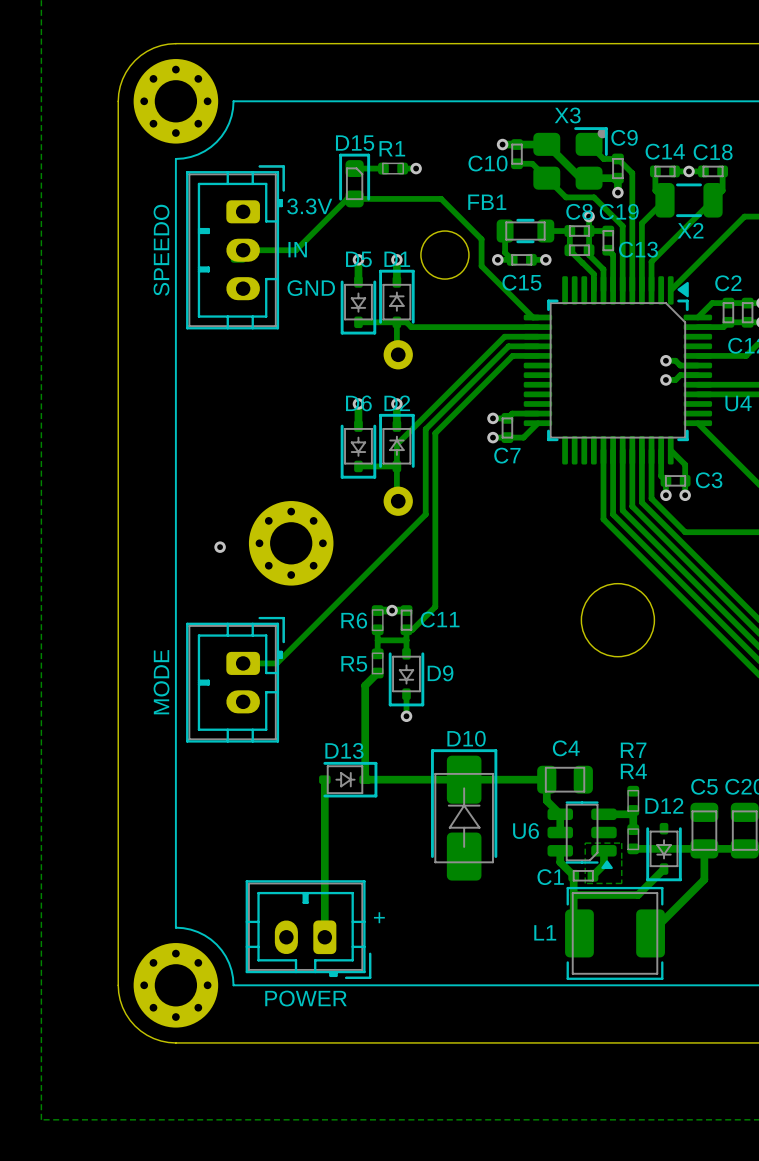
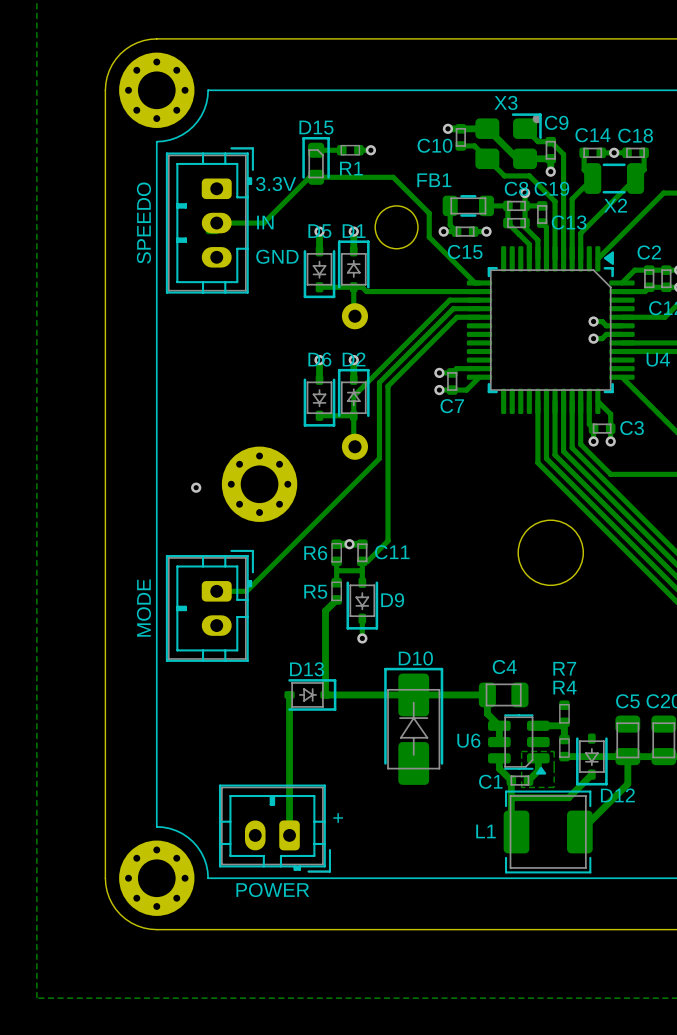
R1 name position: R1 (392, 148) -> R1 (351, 168)
D12 name position: D12 (664, 805) -> D12 (617, 795)

